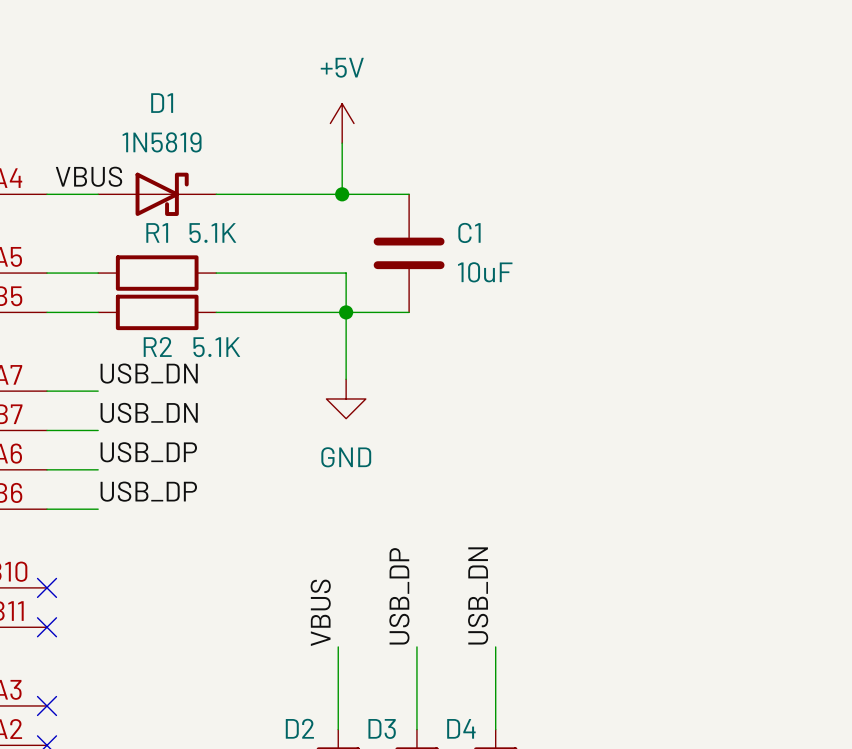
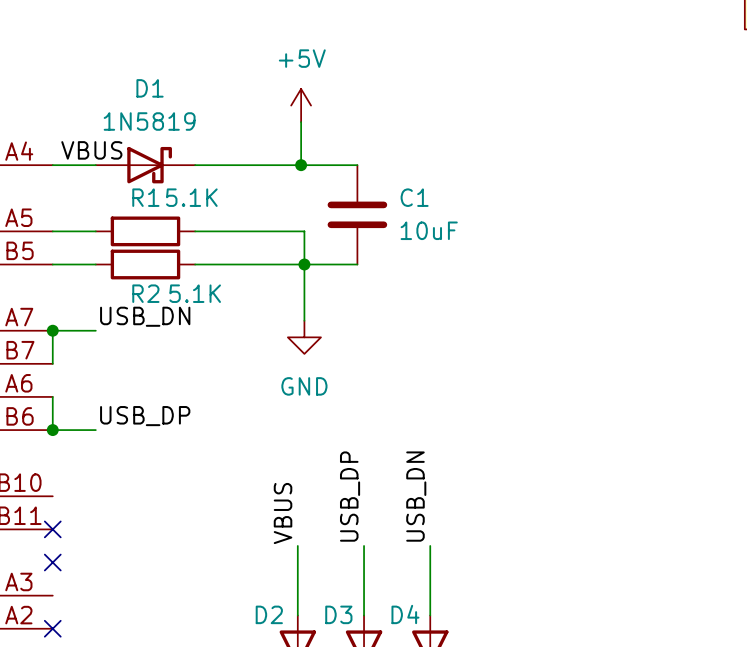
junction: none -> (52, 330)
label: USB_DN (149, 412) -> none
wire: (47, 430) (98, 430) -> (52, 363) (52, 330)
label: USB_DP (148, 452) -> none
wire: (47, 469) (98, 469) -> (52, 396) (52, 430)
junction: none -> (52, 430)
no-connect mark: (47, 587) -> none
no-connect mark: none -> (52, 562)
no-connect mark: (47, 705) -> none

